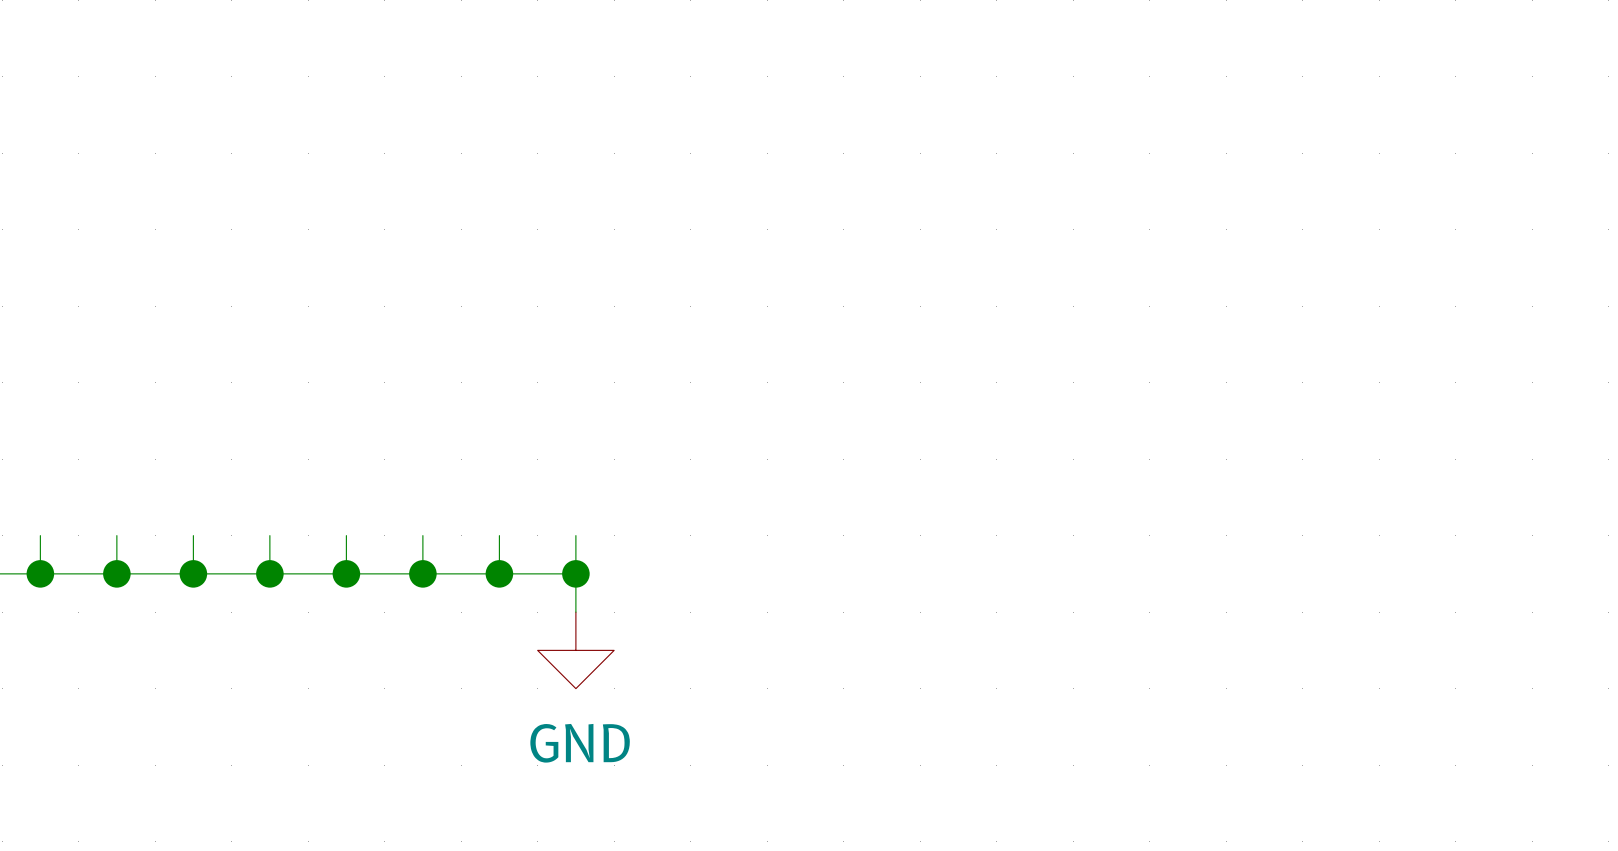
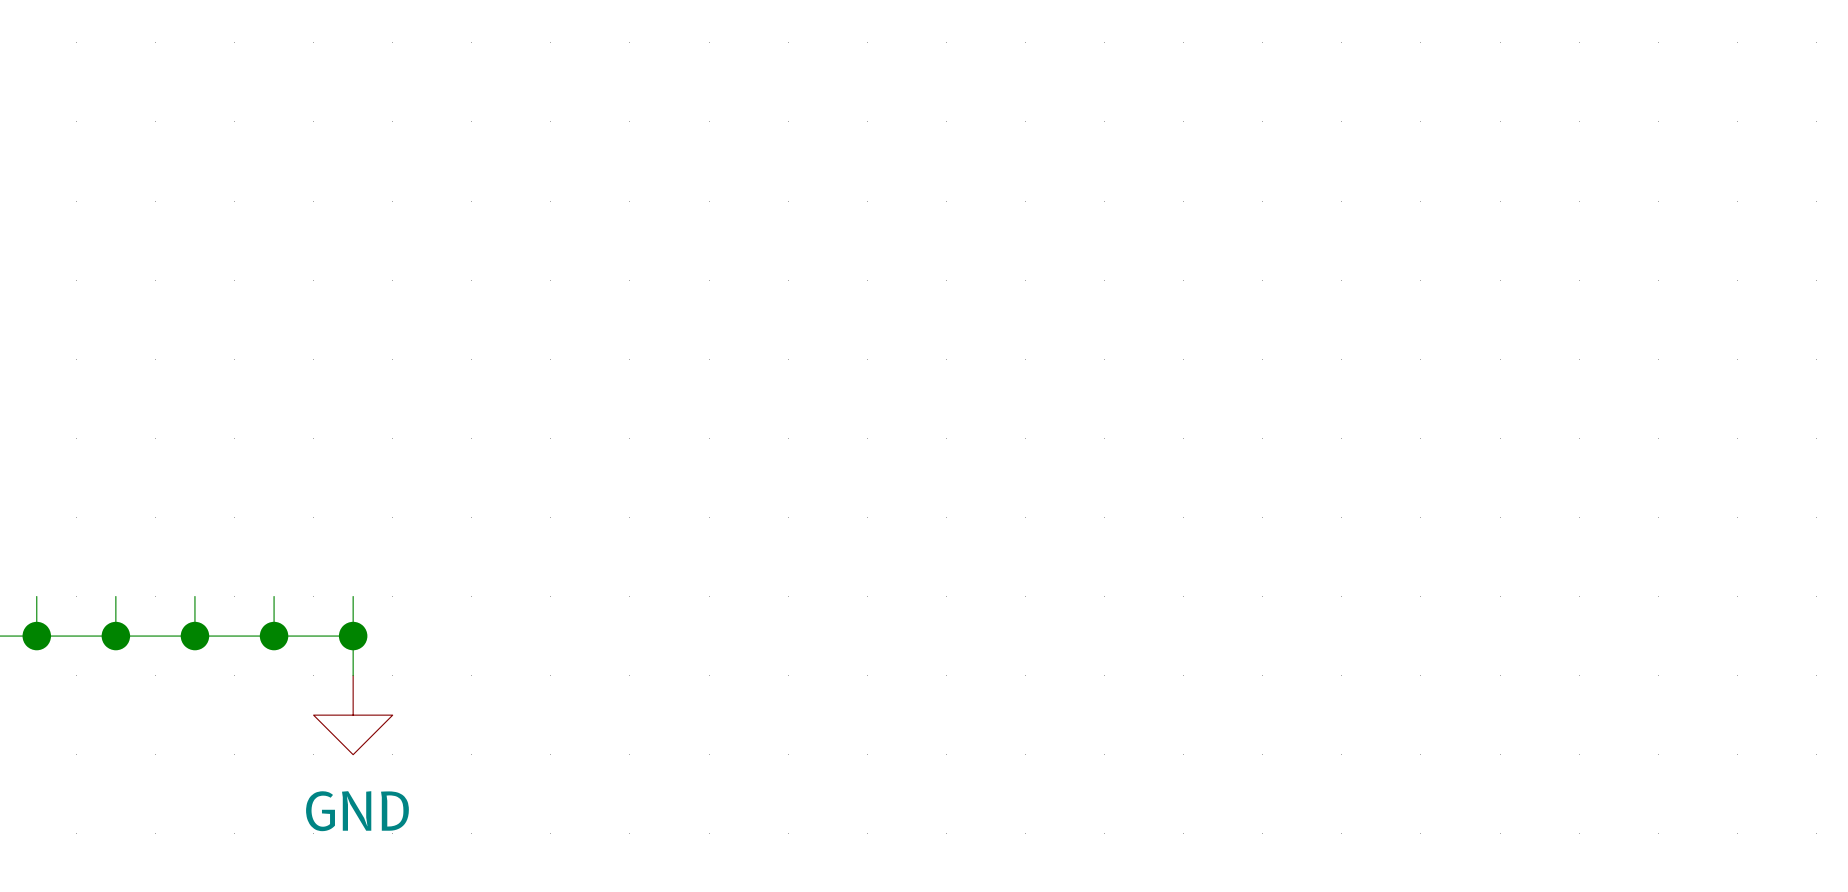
wire: (422, 535) (422, 573) -> none
wire: (499, 535) (499, 573) -> none
wire: (575, 535) (575, 612) -> none
wire: (346, 573) (575, 573) -> (353, 636) (353, 675)
junction: (422, 573) -> none
junction: (499, 573) -> none
junction: (575, 573) -> none
power symbol position: GND (575, 650) -> GND (353, 715)

